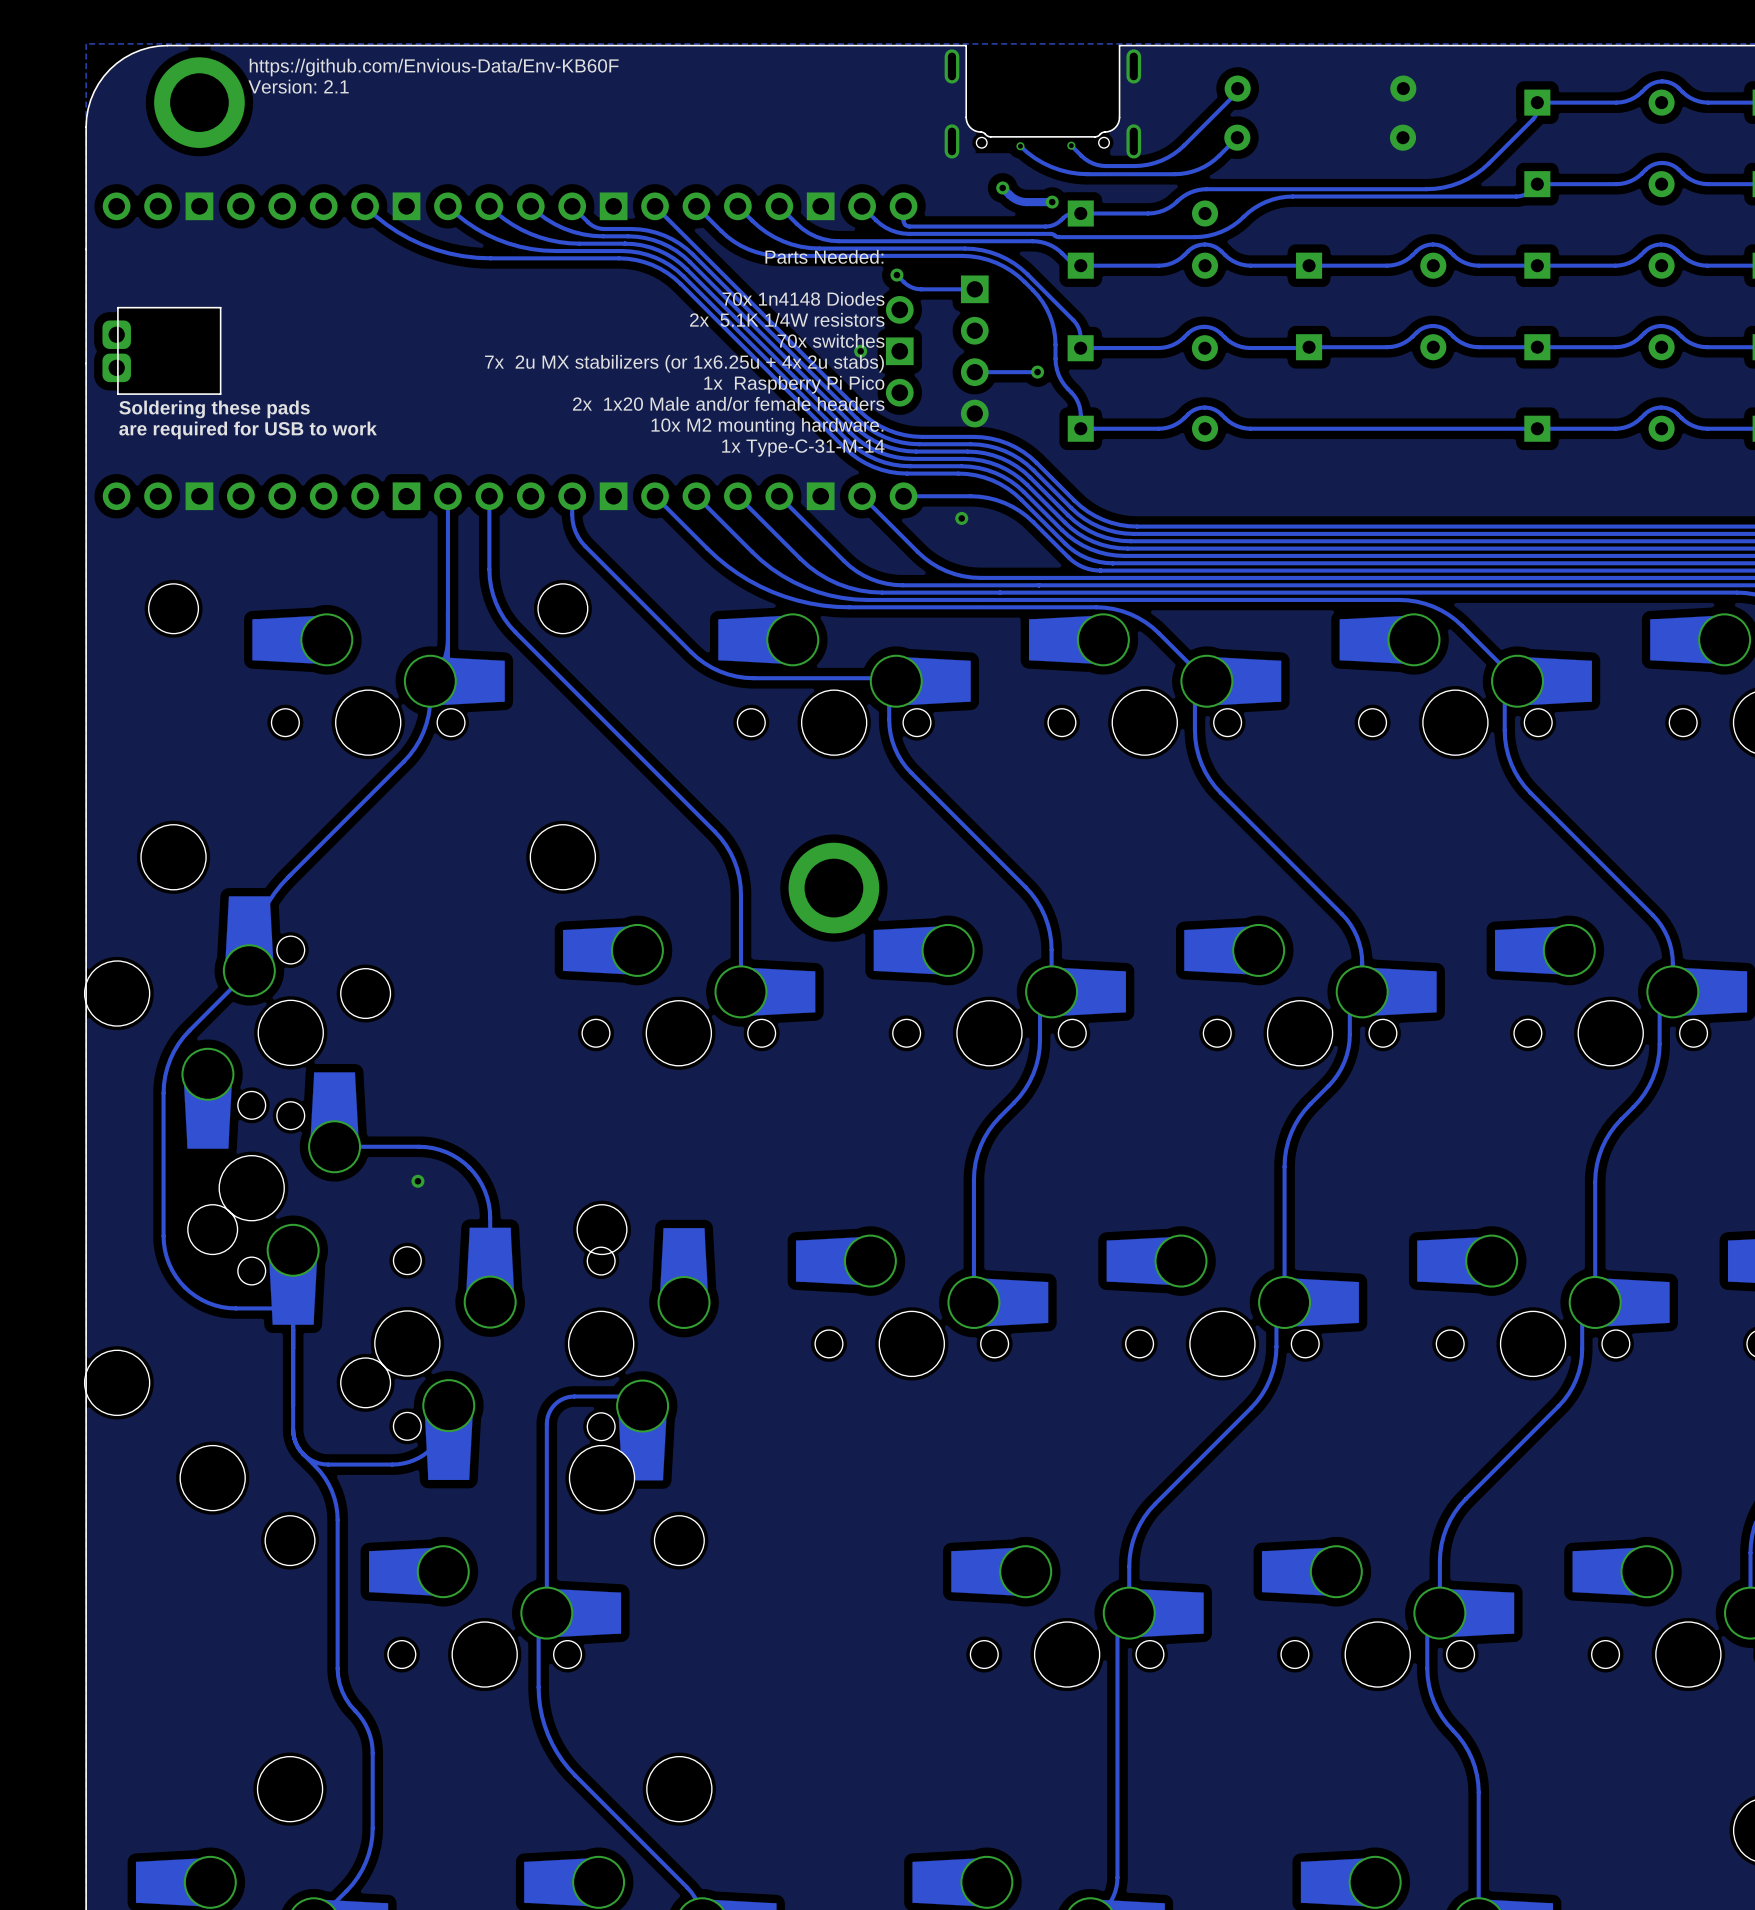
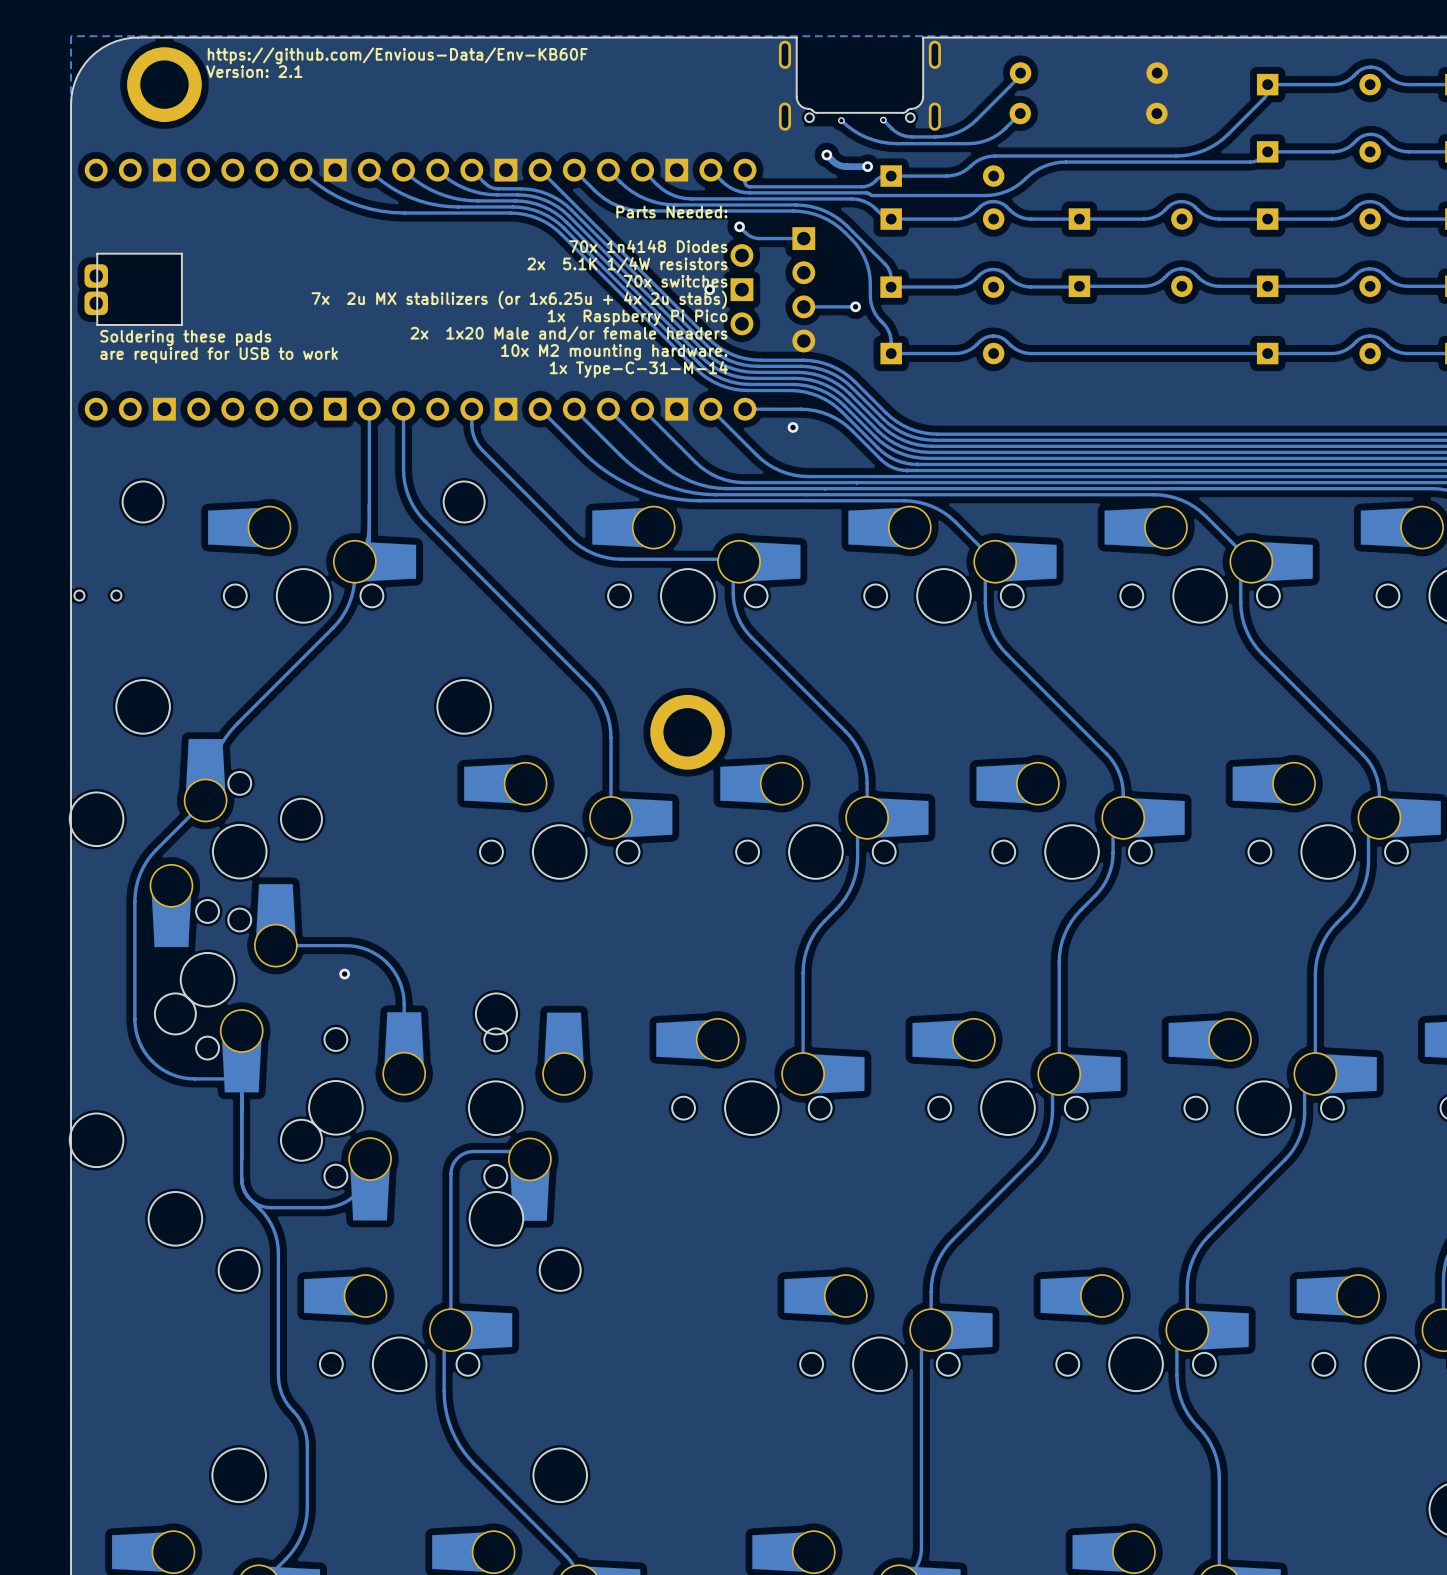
part: none -> (97, 595)

